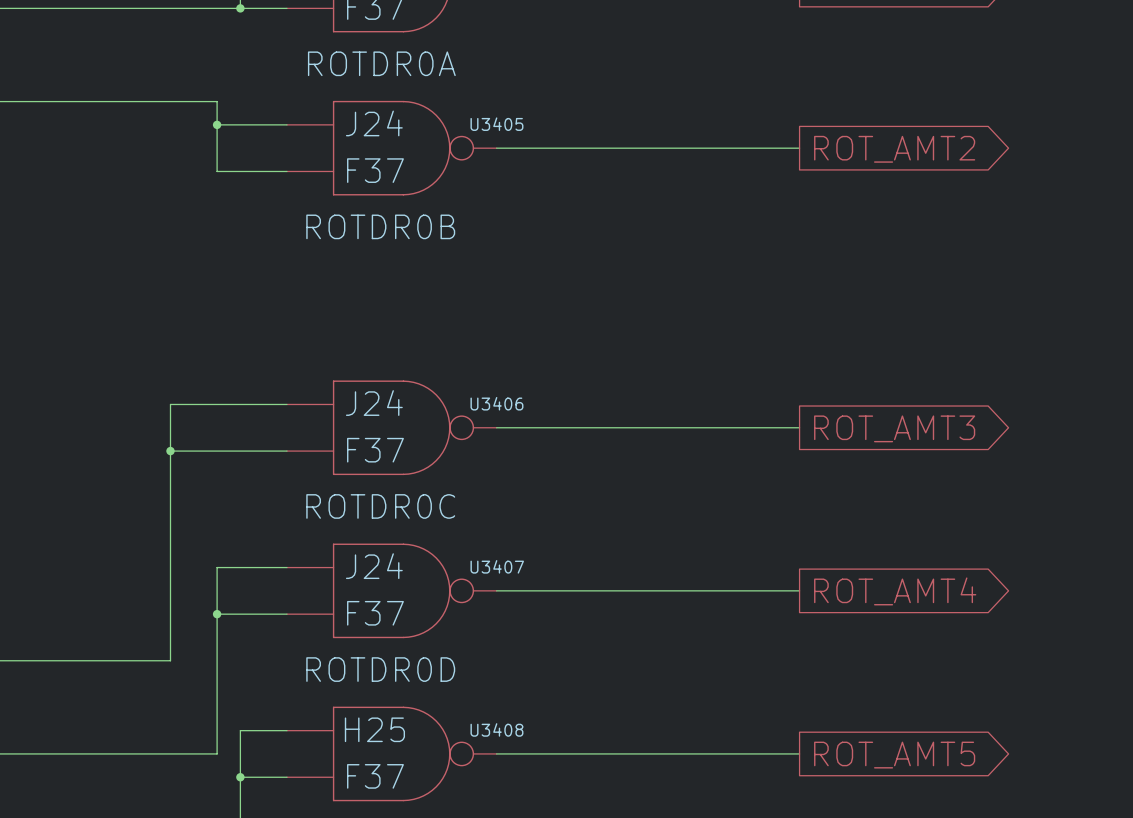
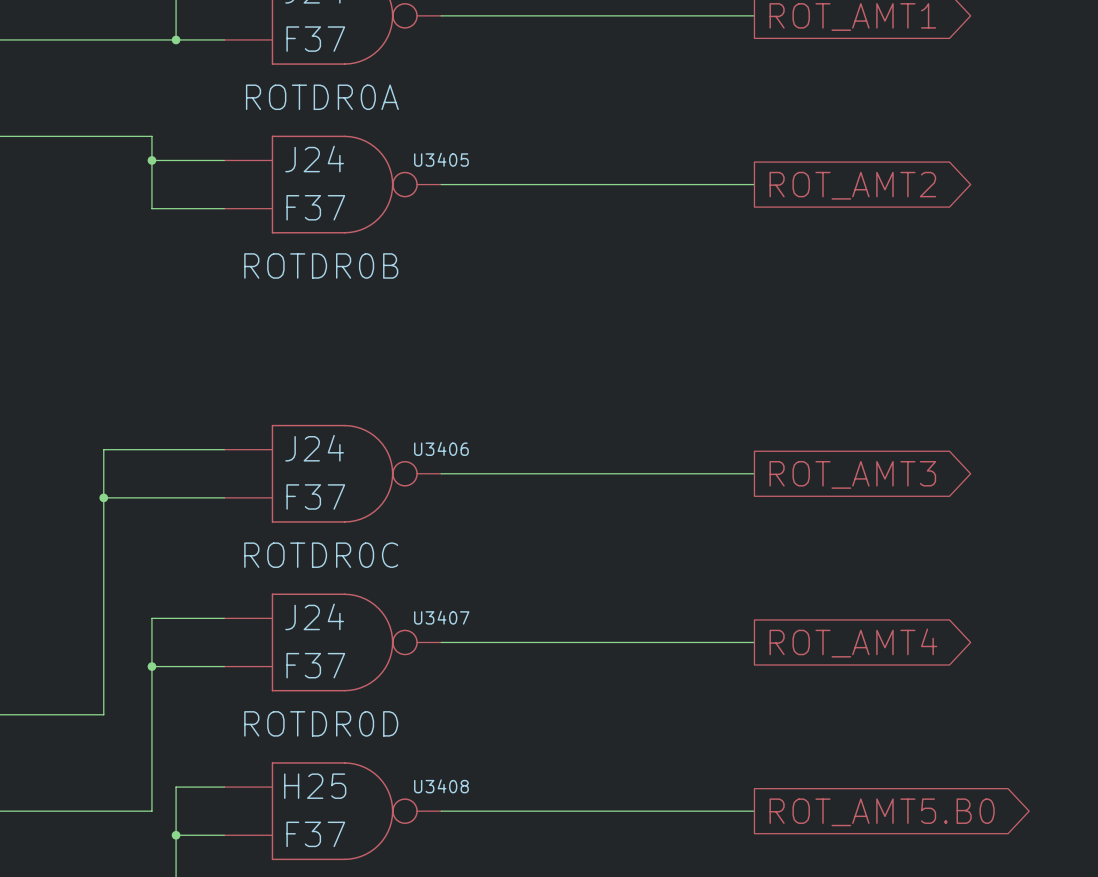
global label: ROT_AMT5 (894, 755) -> ROT_AMT5.B0 (882, 812)

